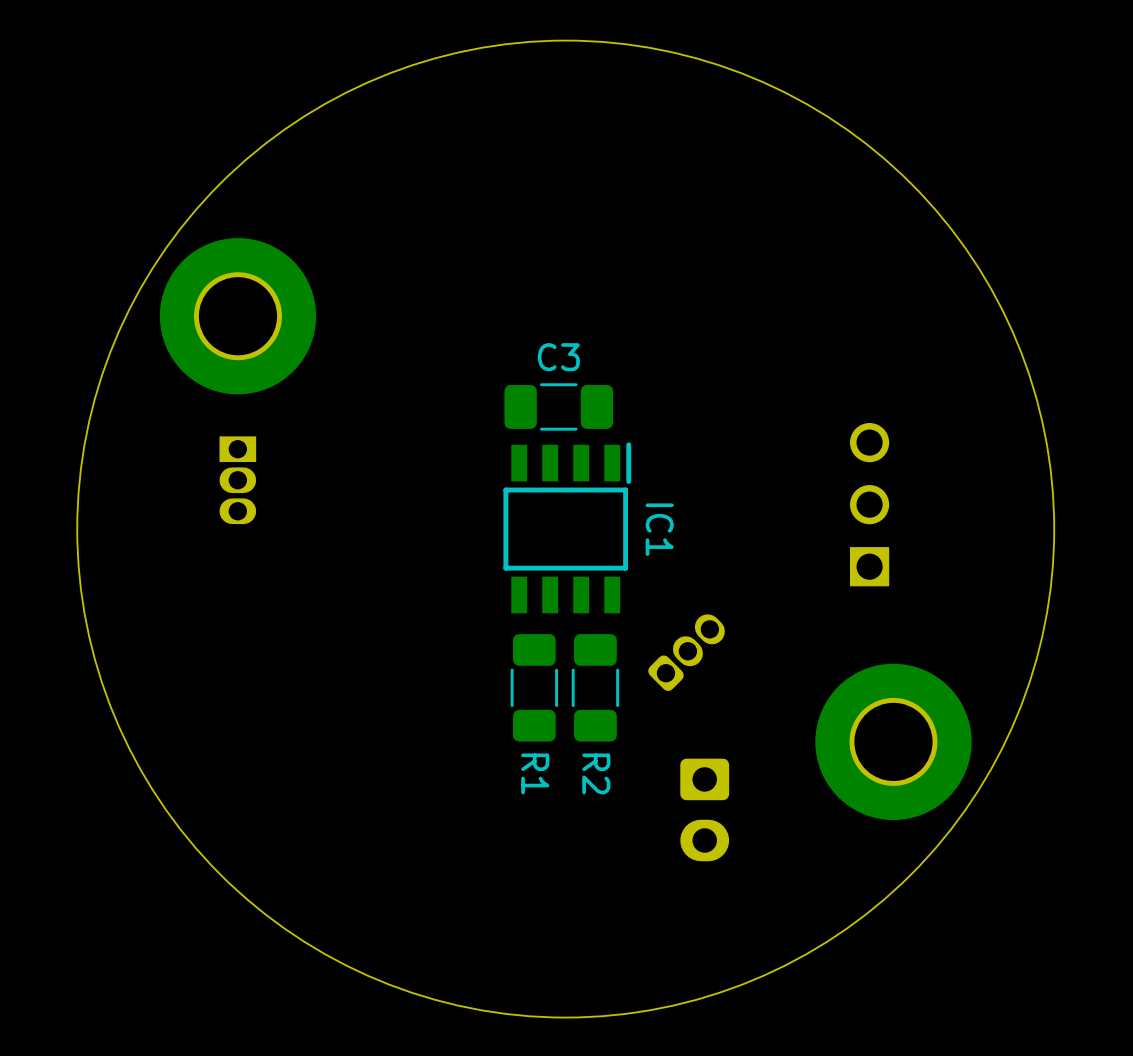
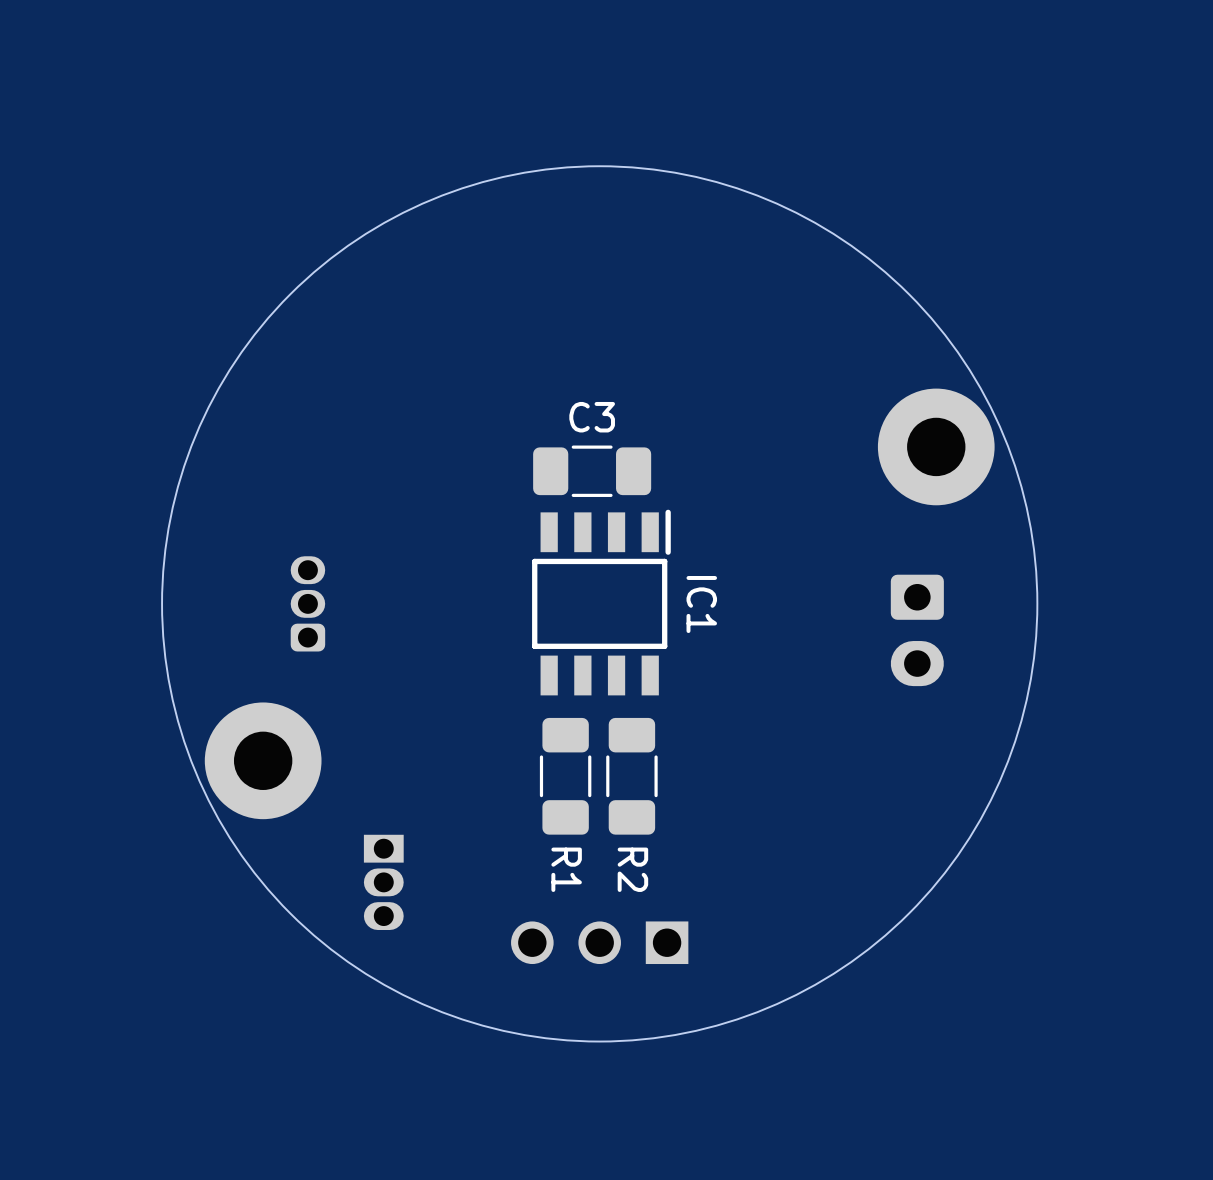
round board edge size: [76, 39, 1055, 1019] -> [161, 165, 1039, 1043]
part: (237, 316) -> none
part: none -> (936, 446)
part position: (237, 480) -> (383, 882)
part rotation: 0° (869, 504) -> 90° counterclockwise (599, 942)
part position: (869, 504) -> (599, 942)
part: none -> (307, 603)
part: (686, 652) -> none
part: none -> (263, 760)
part: (893, 741) -> none
part position: (704, 809) -> (917, 630)

